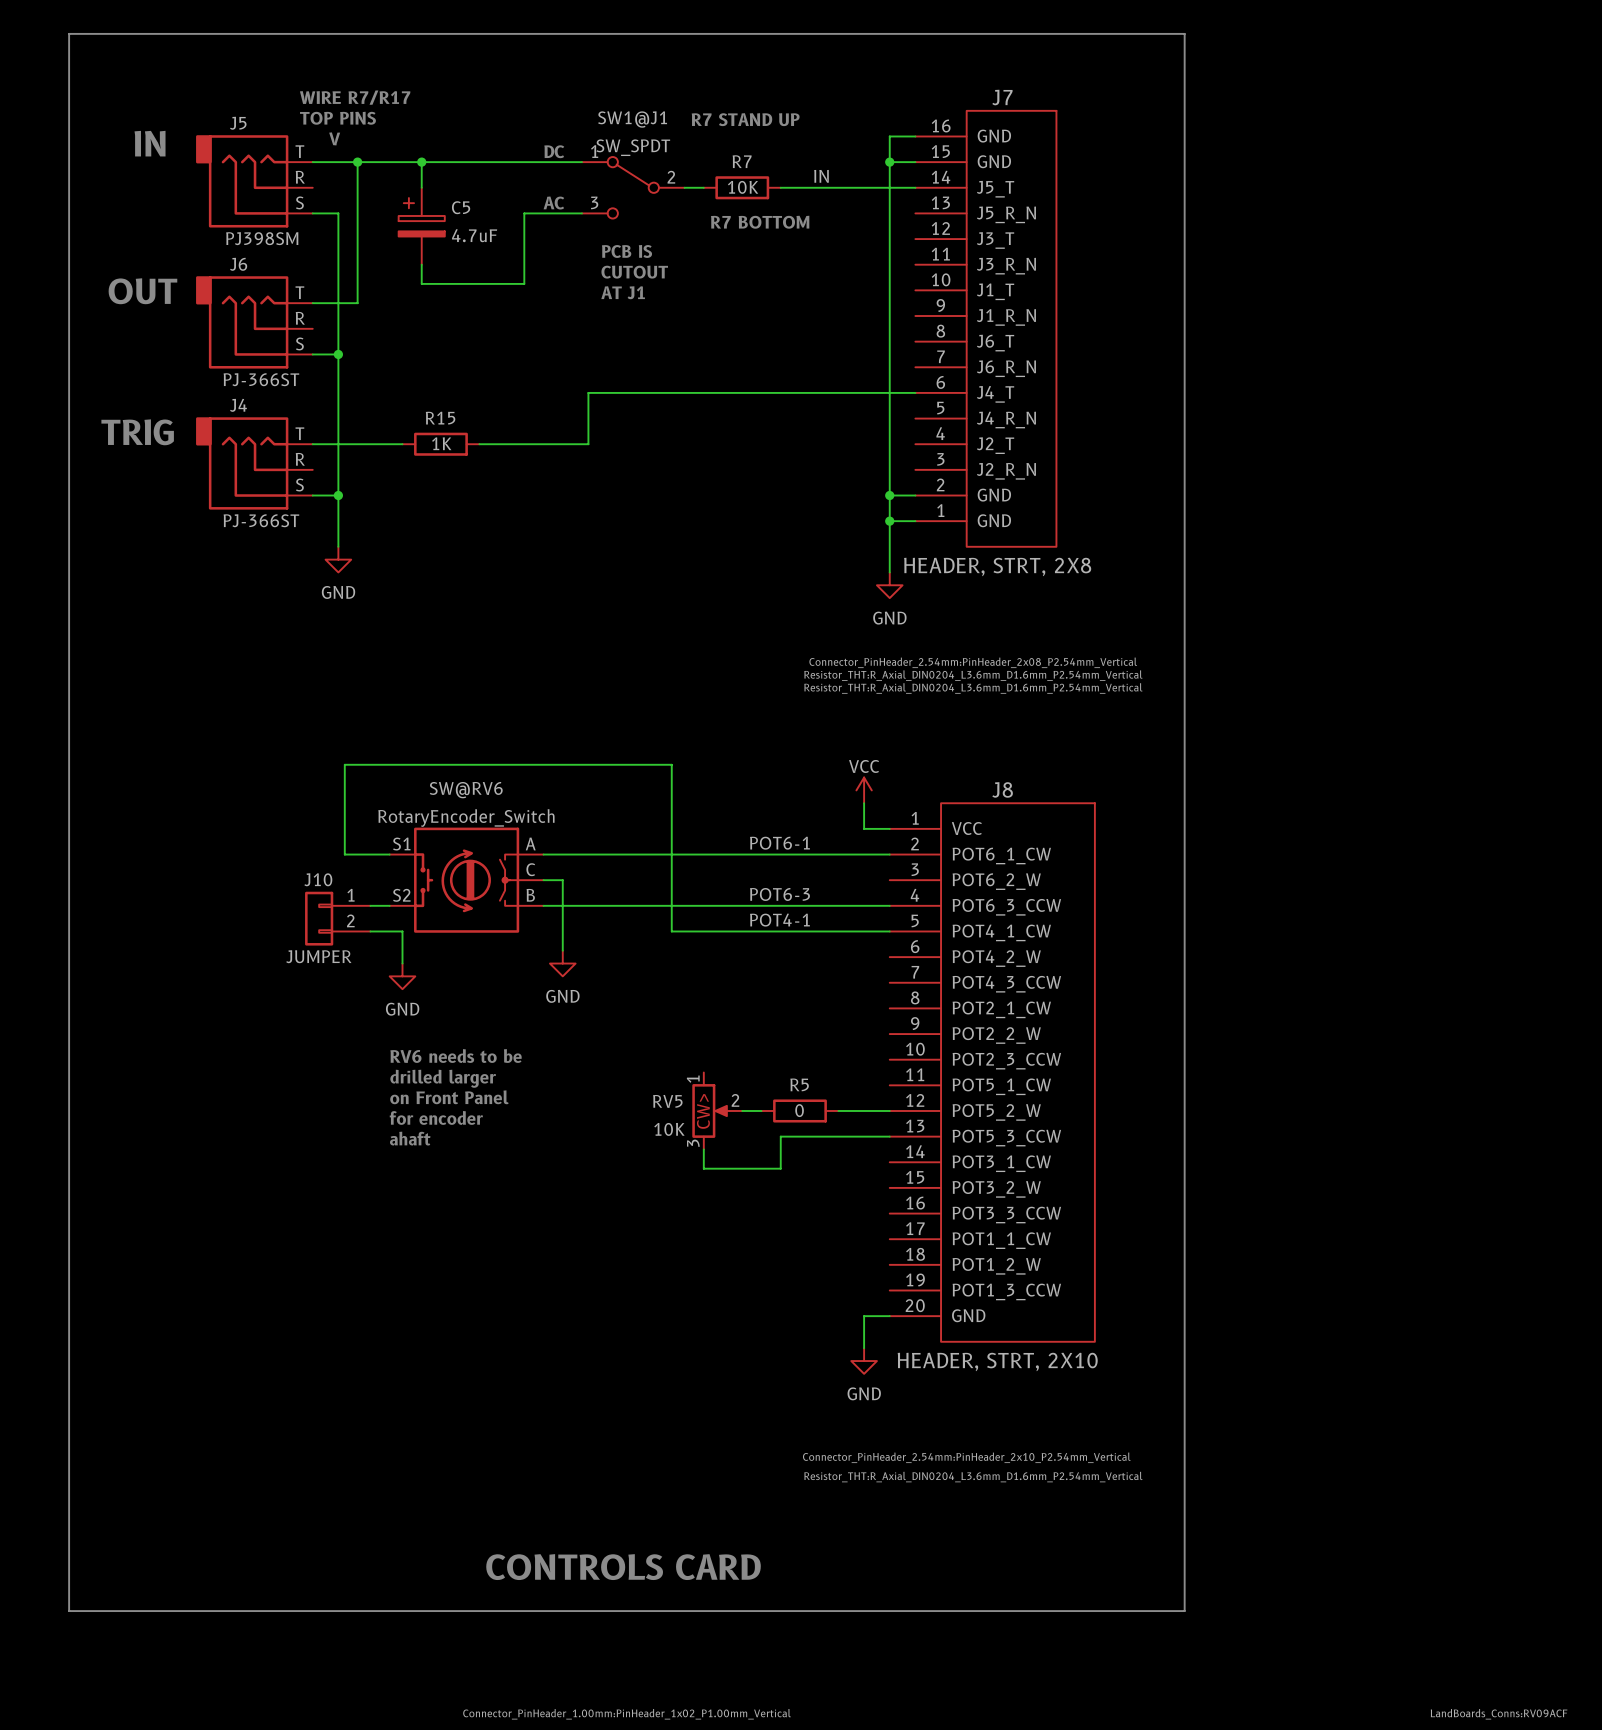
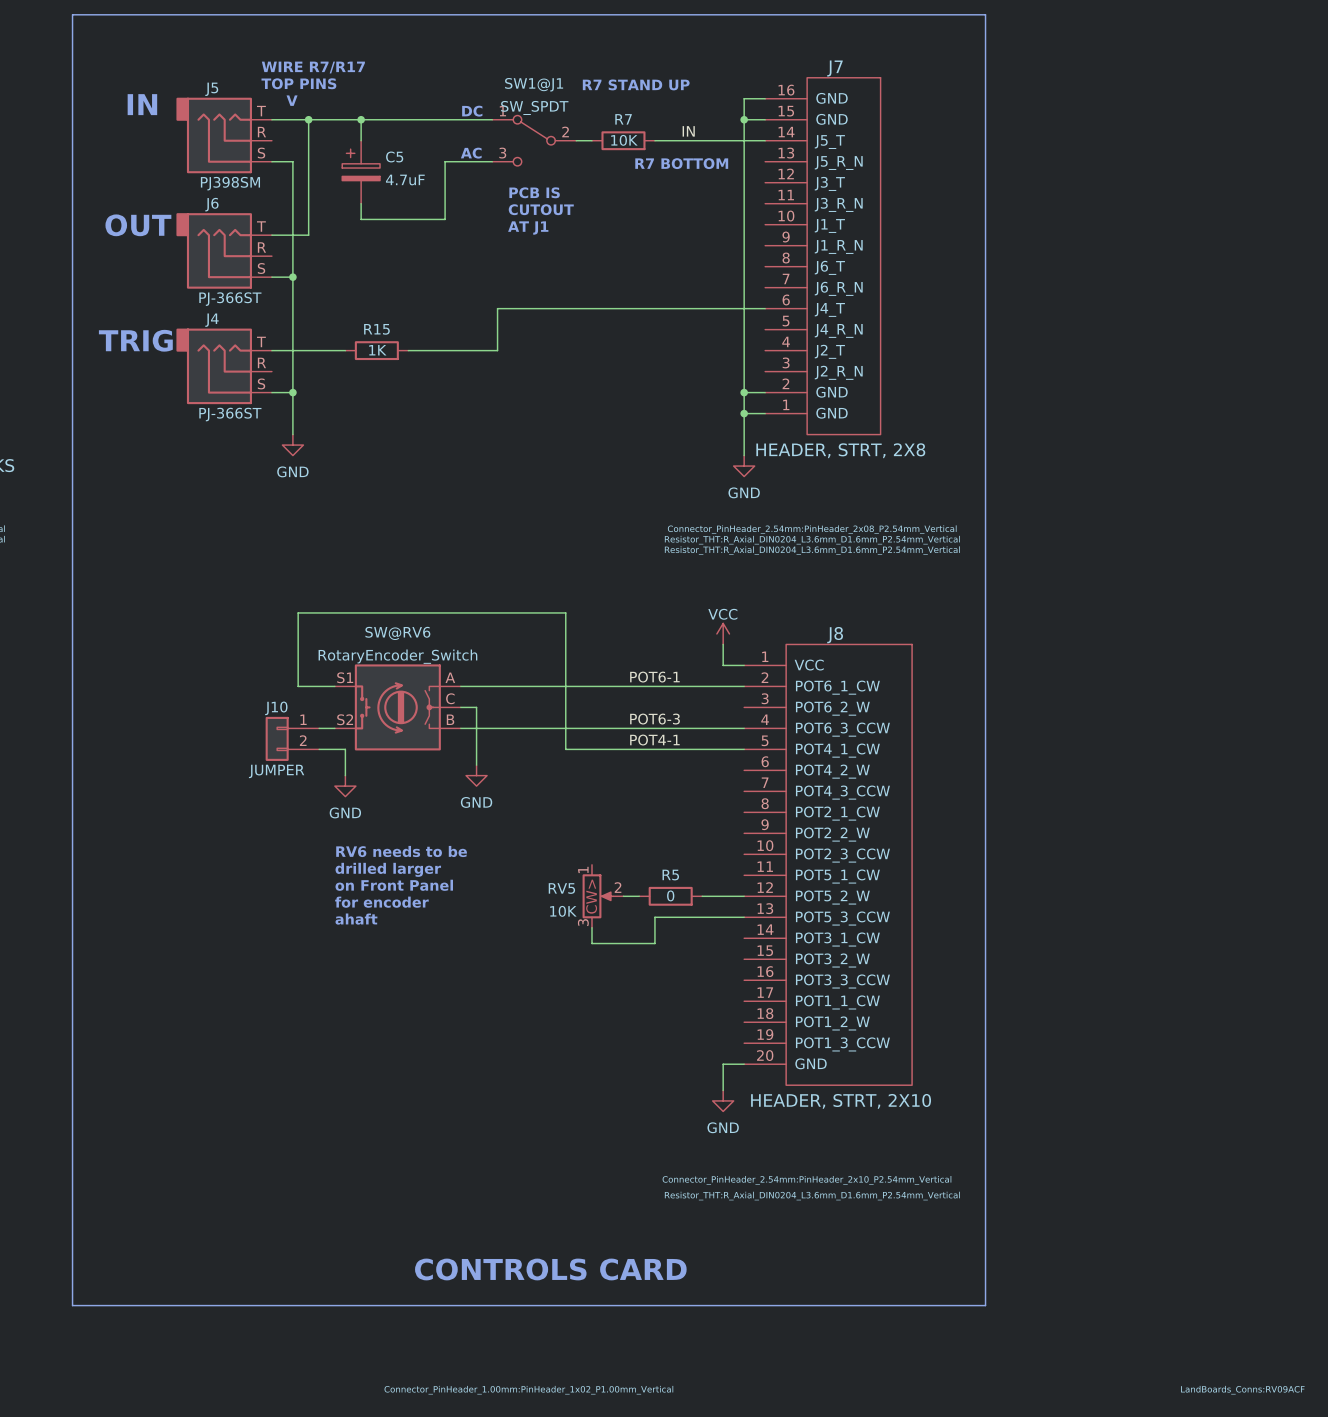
text position: R7 BOTTOM (760, 222) -> R7 BOTTOM (681, 163)

